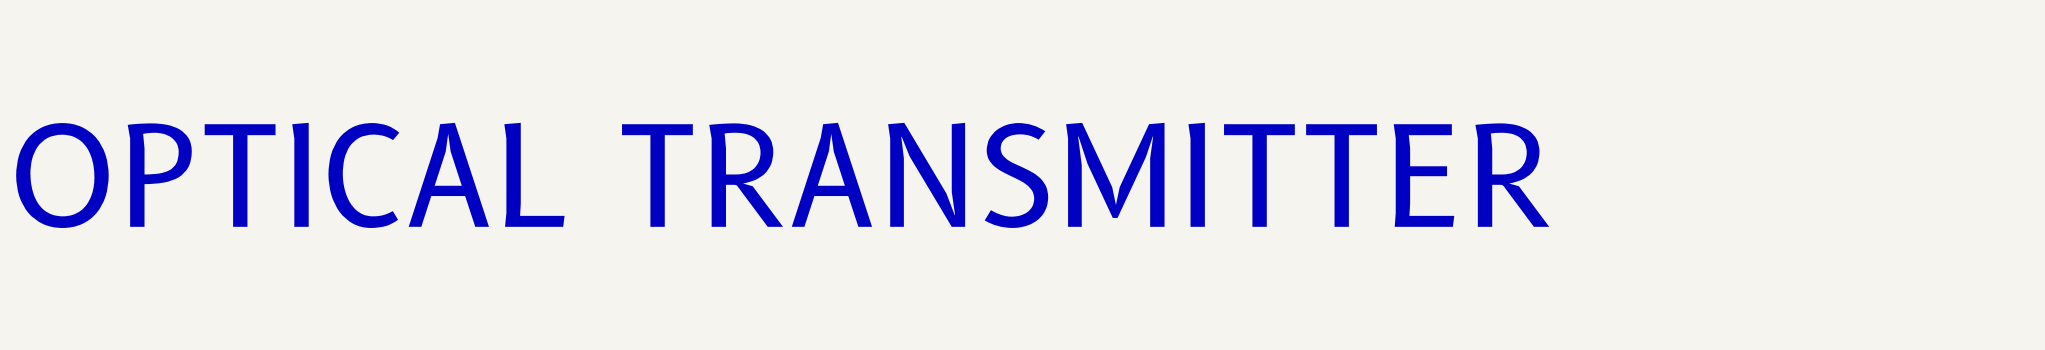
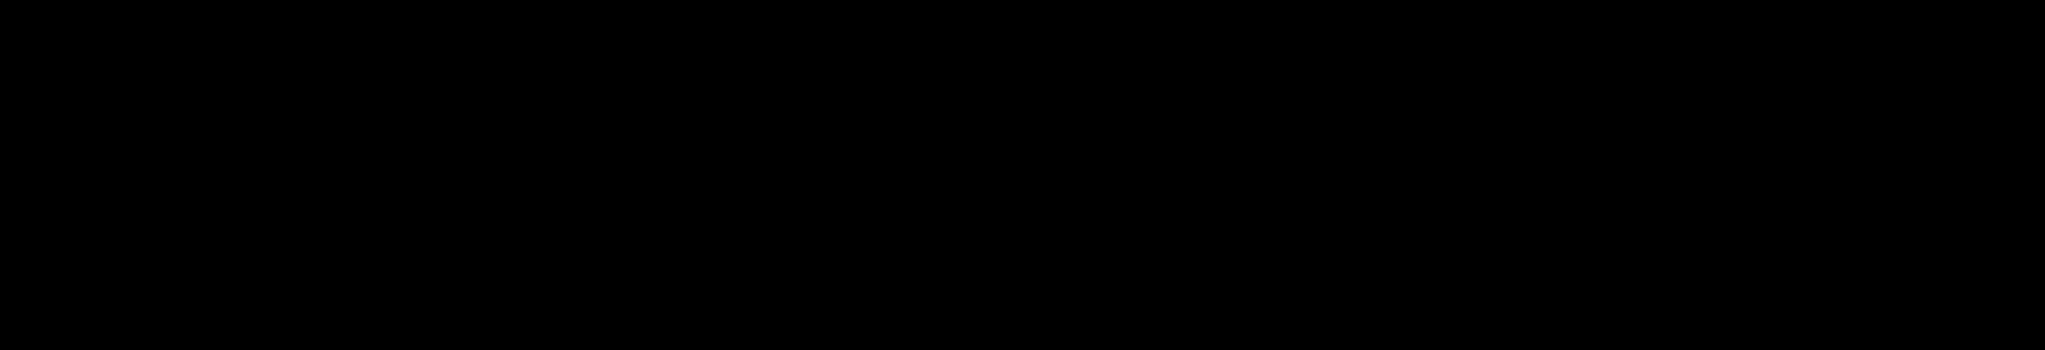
text: OPTICAL TRANSMITTER (782, 175) -> none

